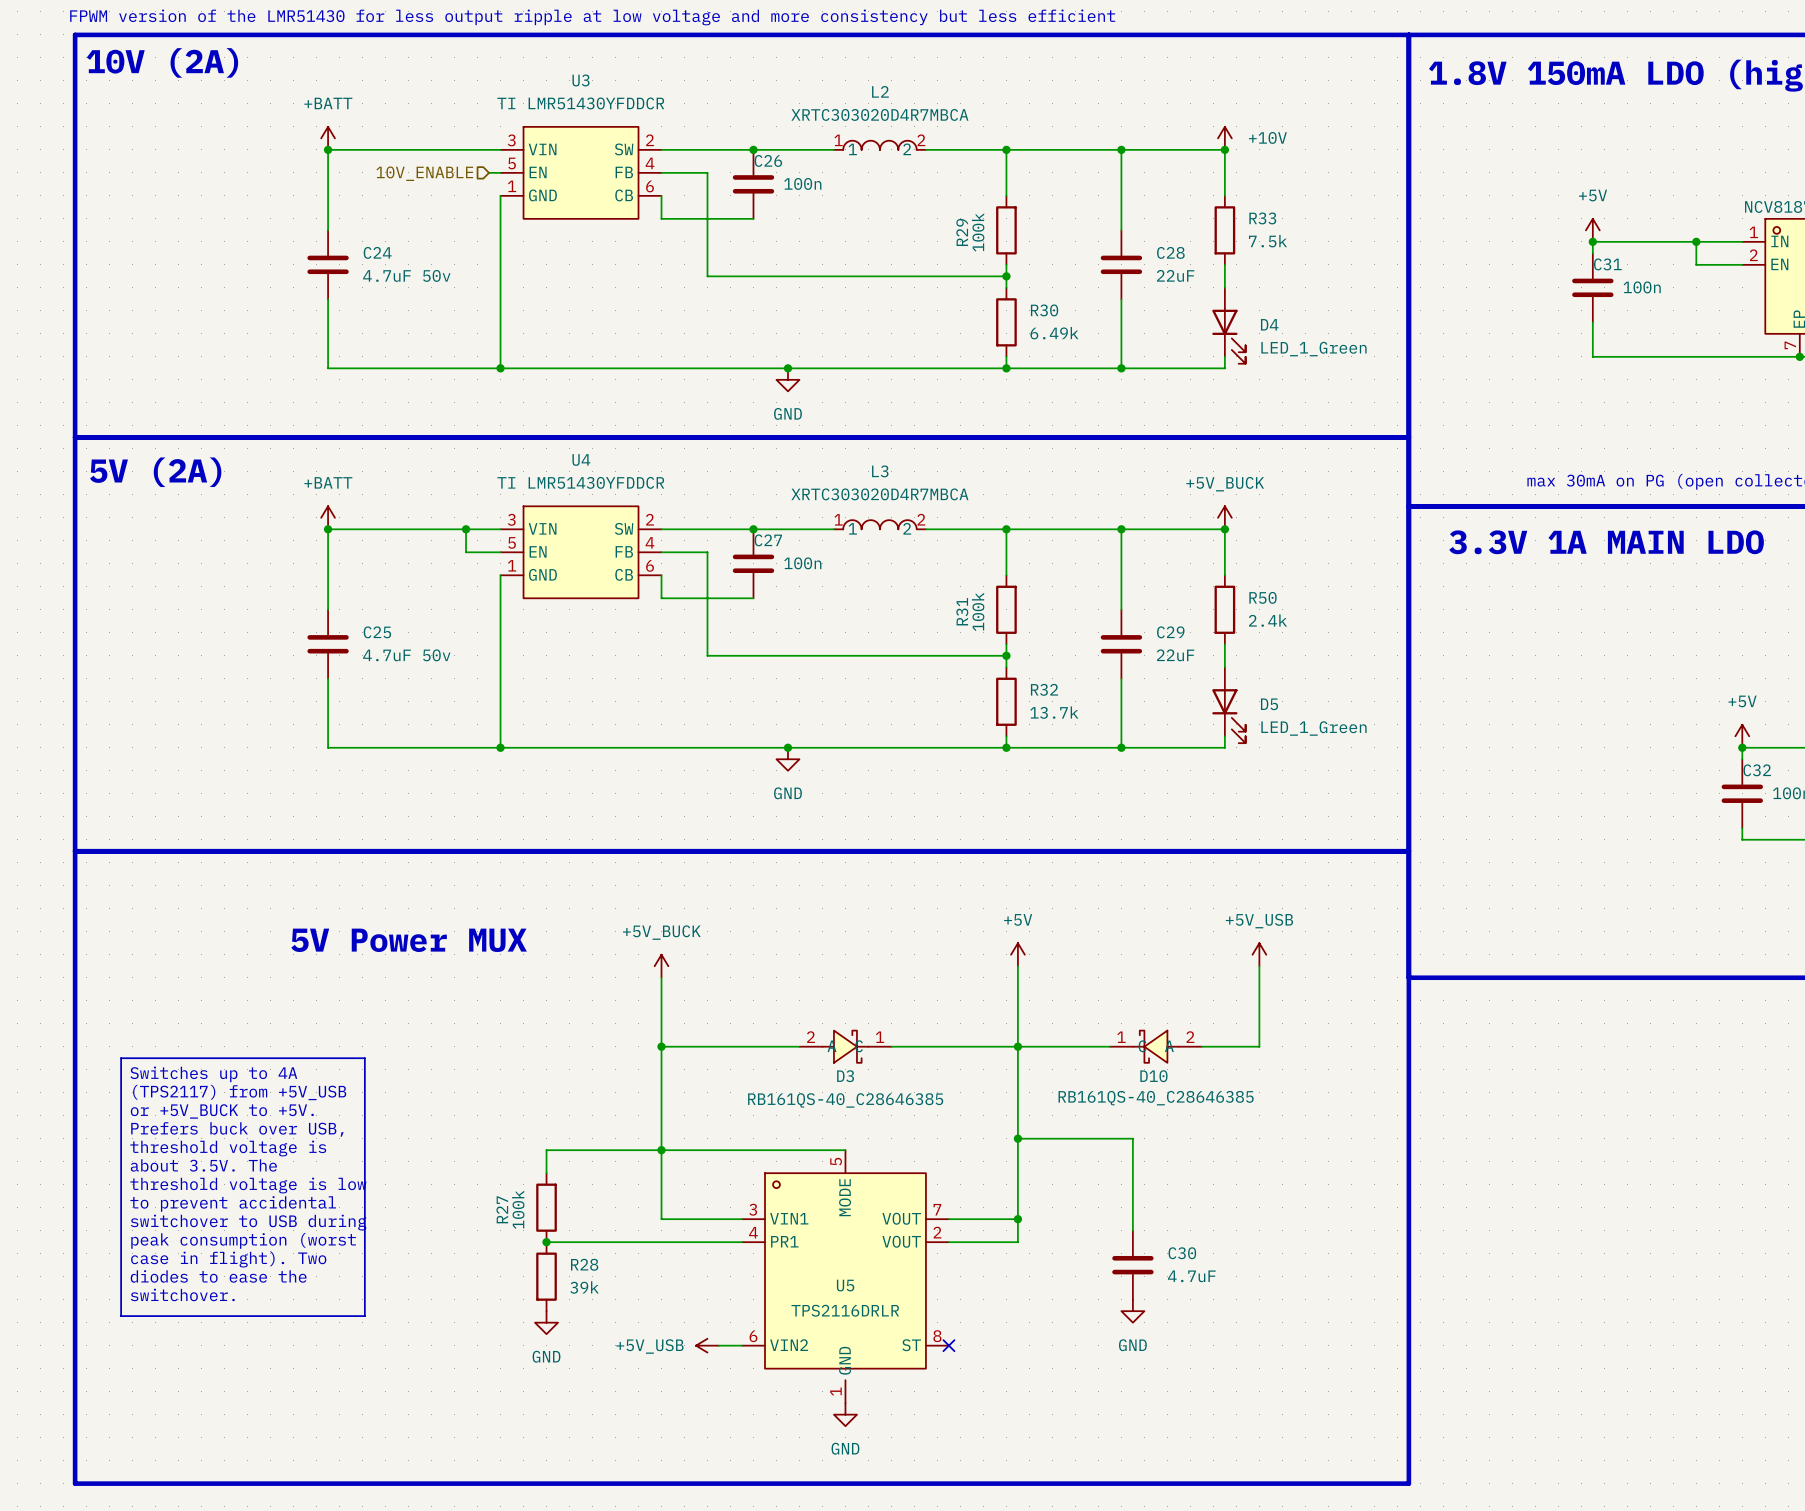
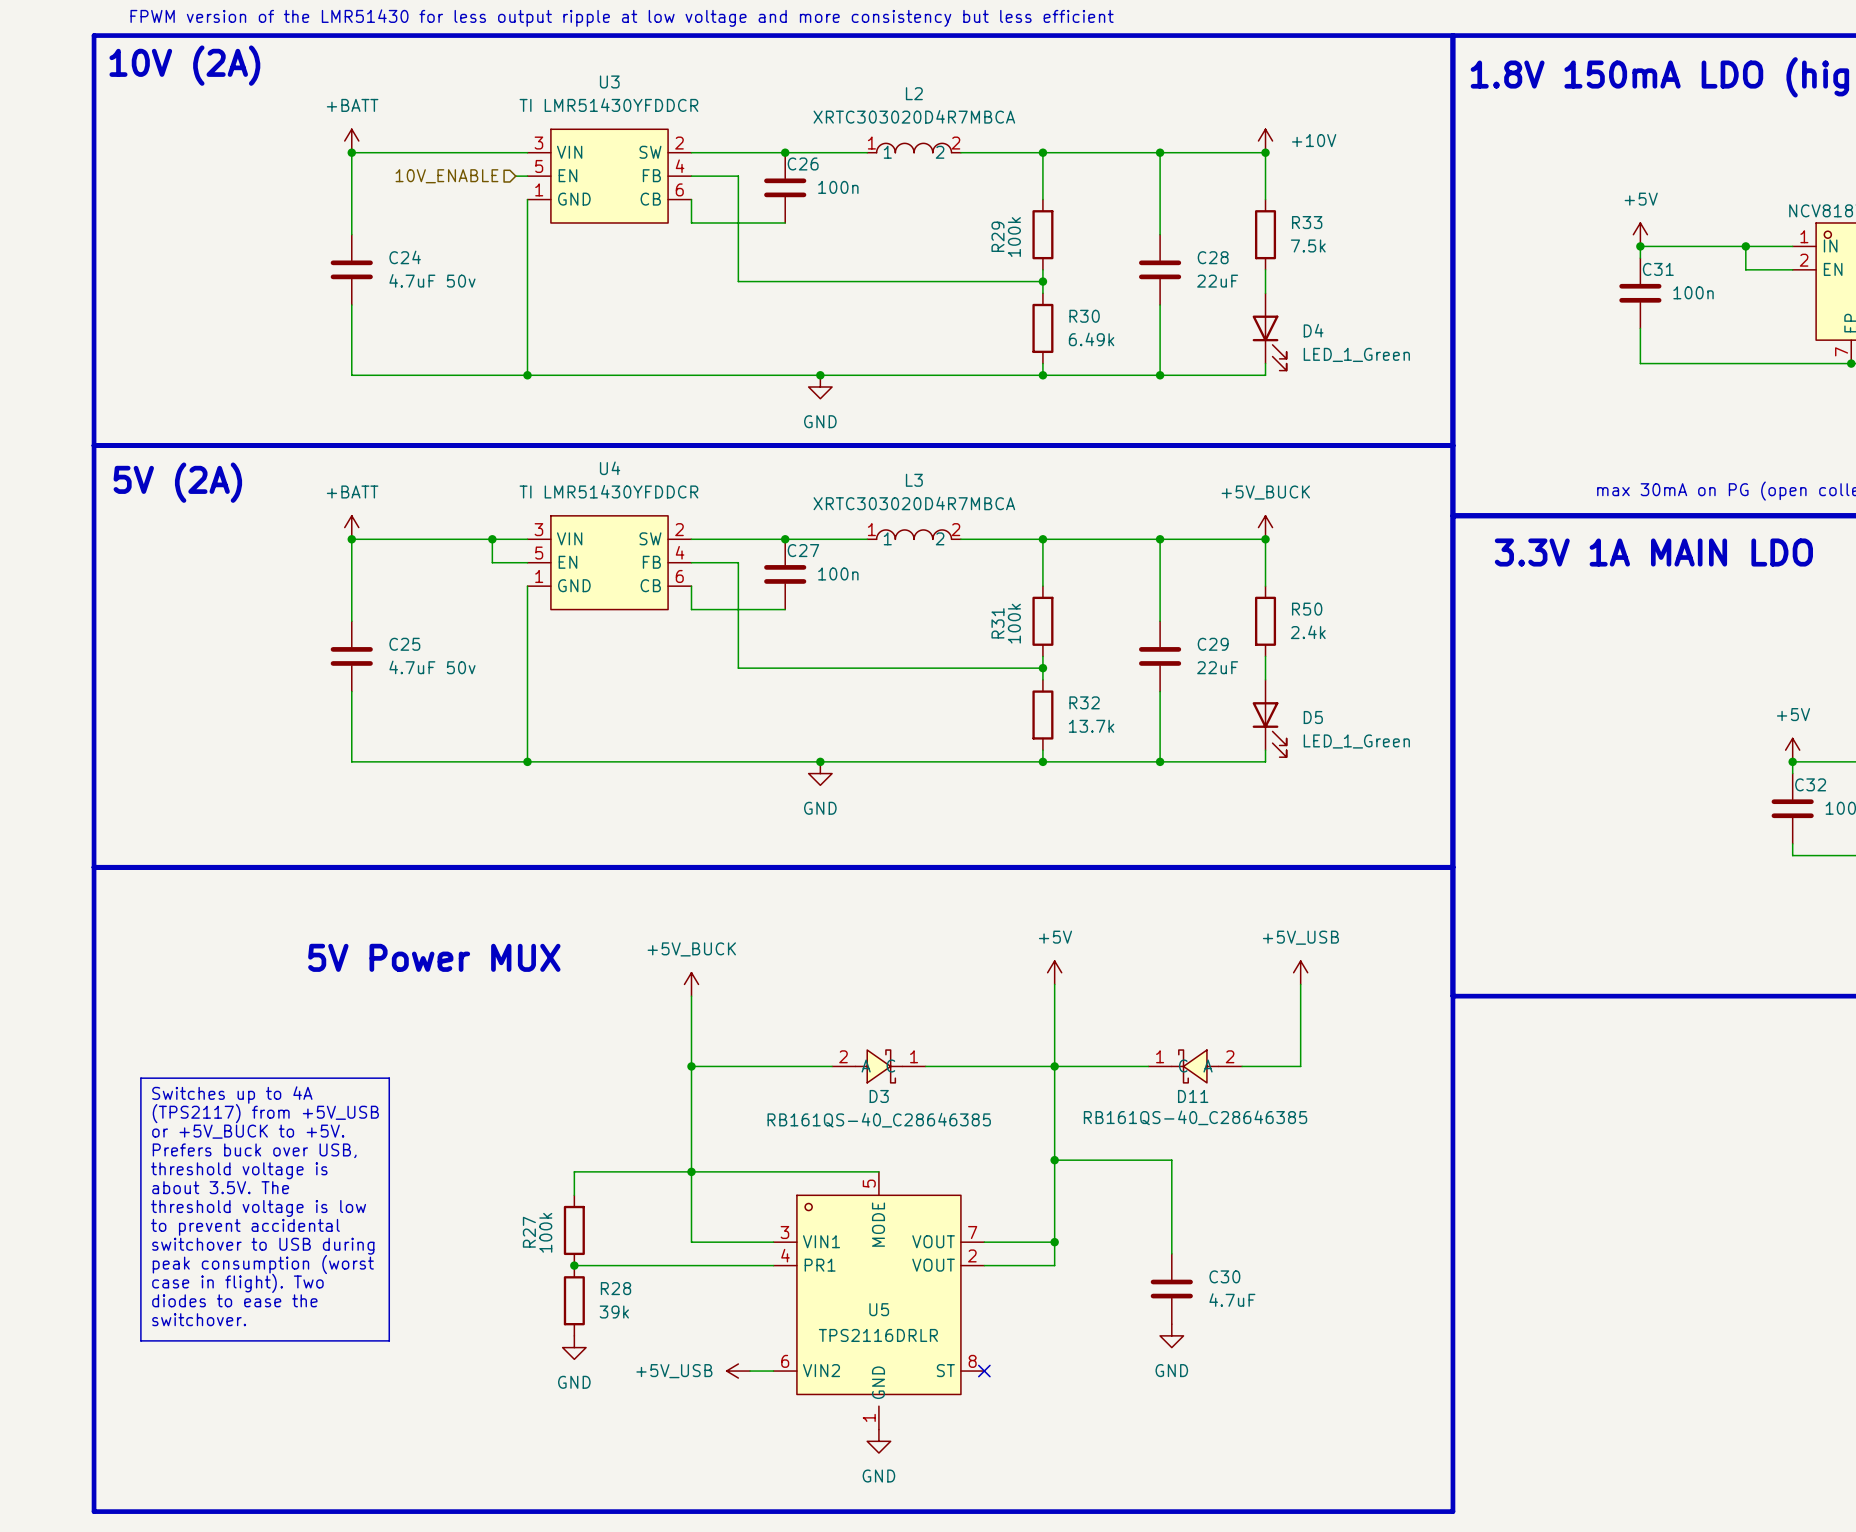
D10 name: D10 (1153, 1076) -> D11 (1193, 1096)

